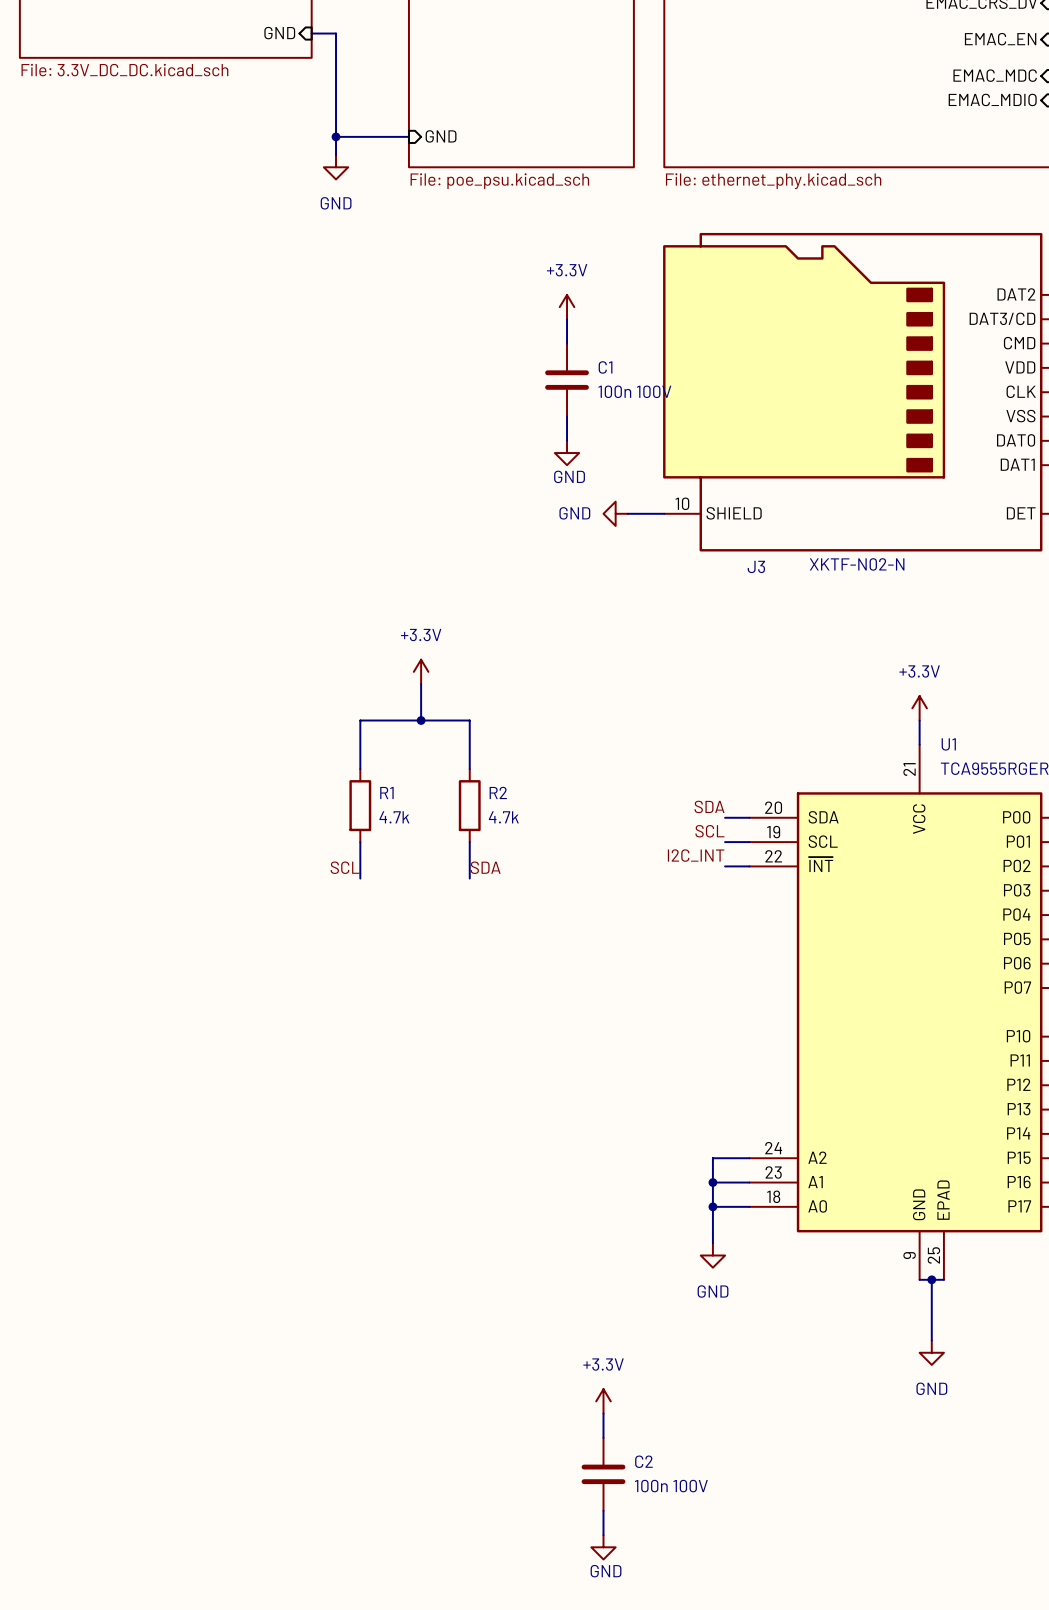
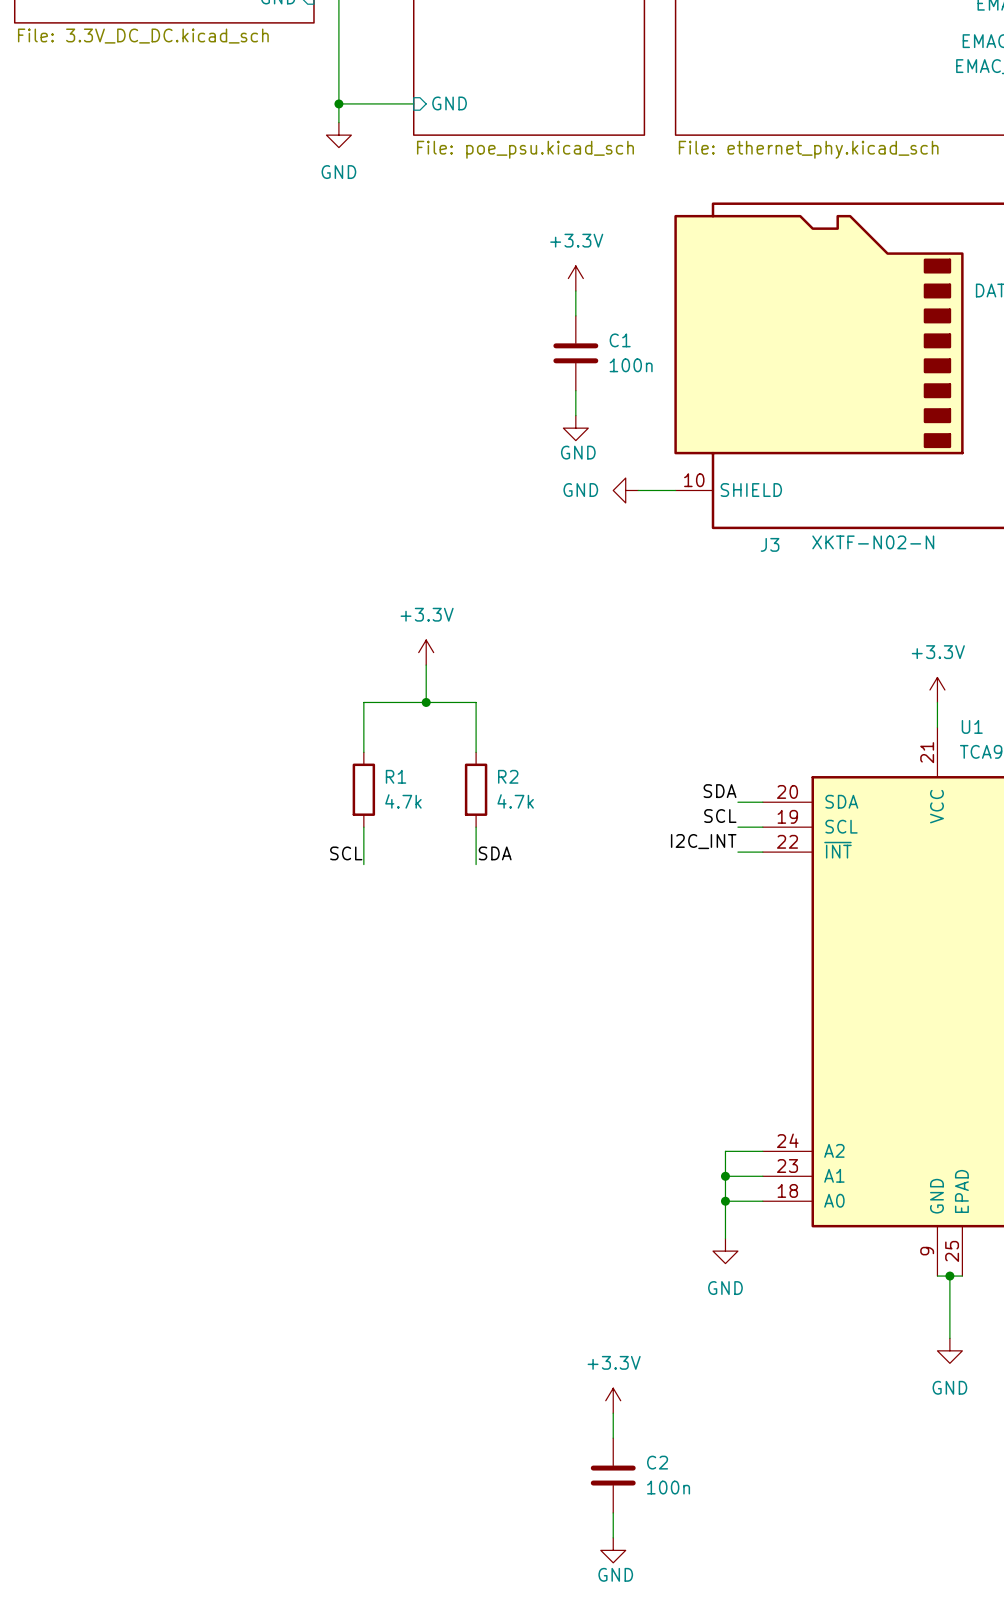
C1 value: 100n 100V (634, 391) -> 100n (631, 365)
C2 value: 100n 100V (671, 1486) -> 100n (668, 1487)

